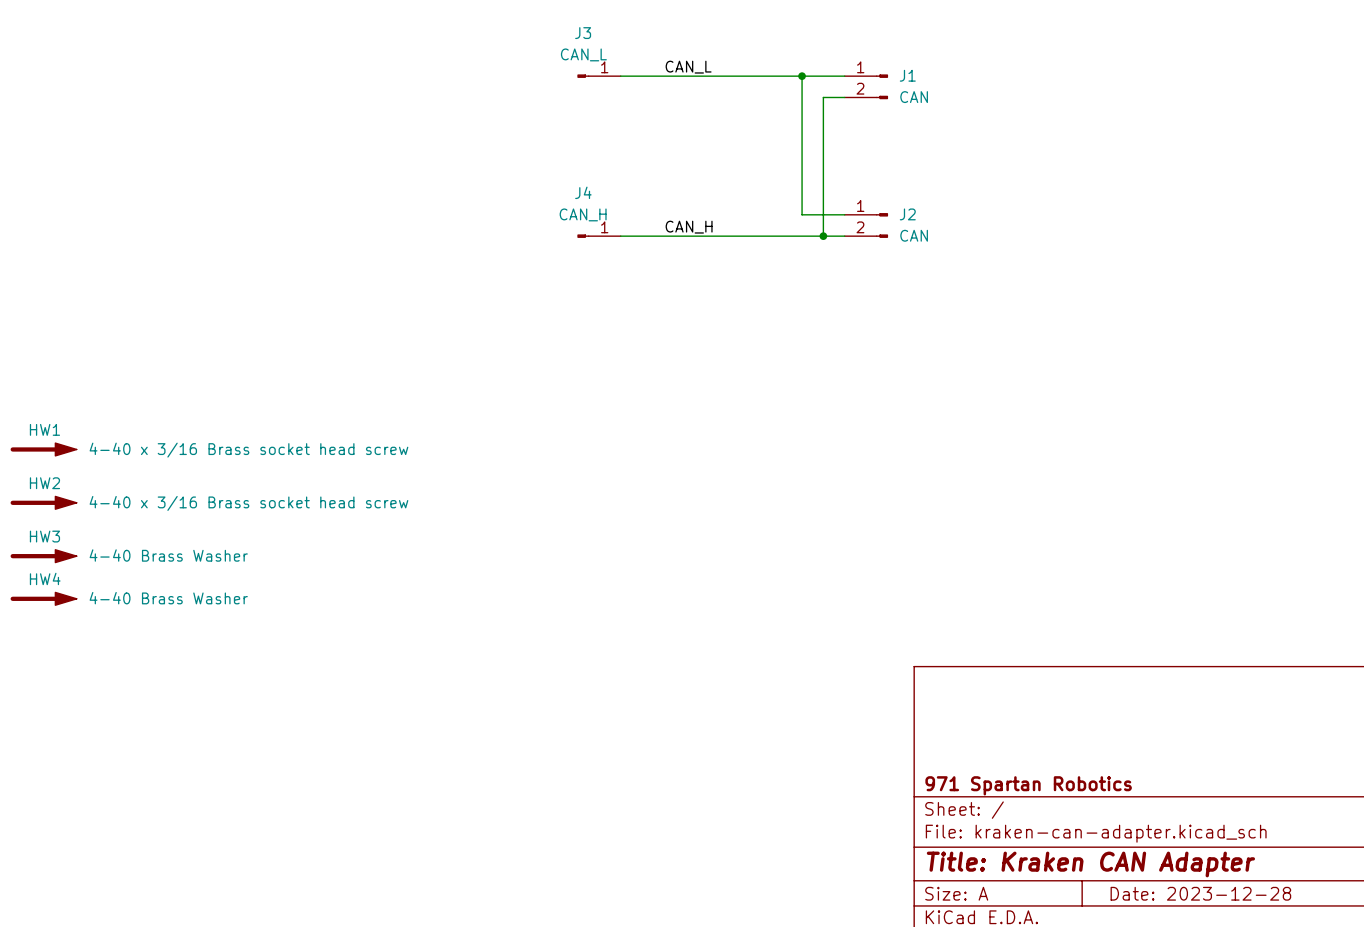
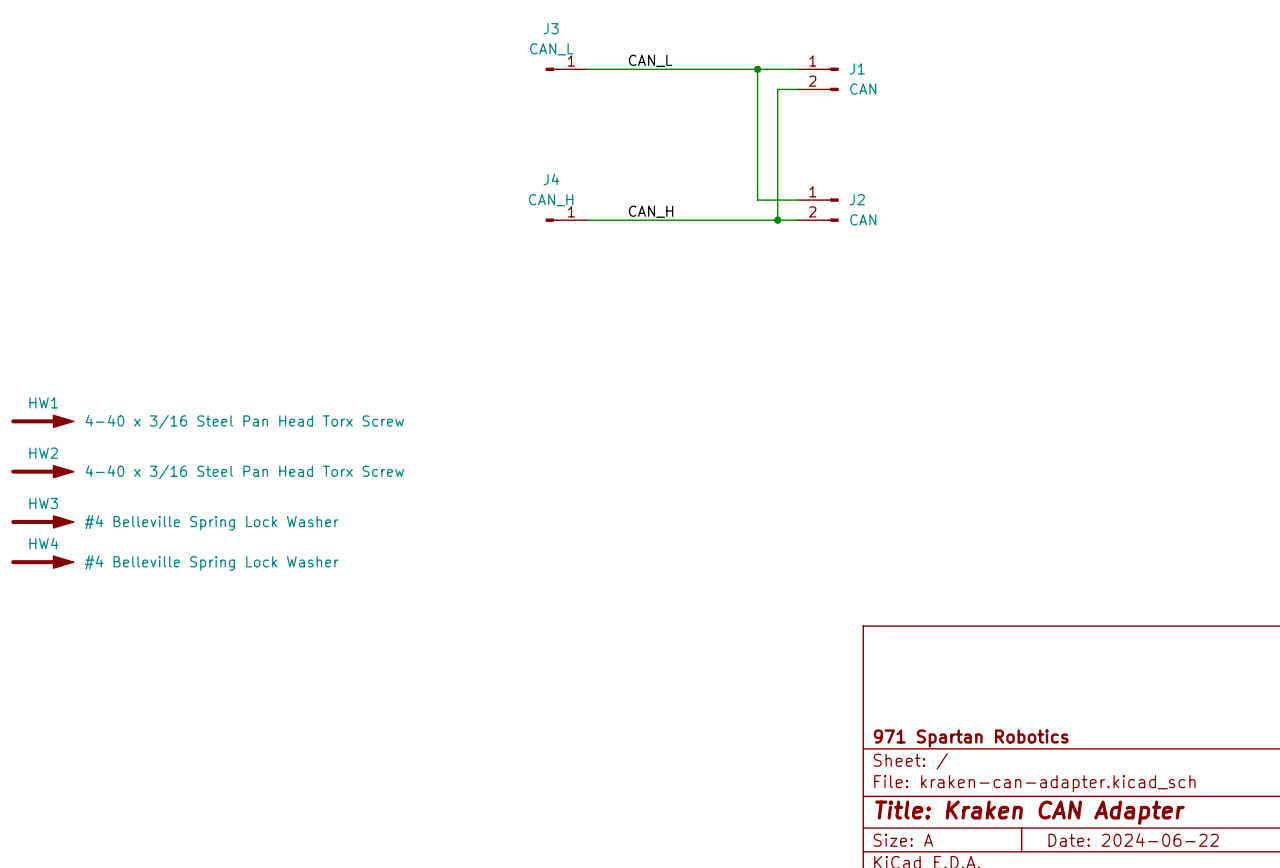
HW1 value: 4-40 x 3/16 Brass socket head screw (248, 450) -> 4-40 x 3/16 Steel Pan Head Torx Screw (244, 421)
HW2 value: 4-40 x 3/16 Brass socket head screw (248, 503) -> 4-40 x 3/16 Steel Pan Head Torx Screw (244, 472)
HW3 value: 4-40 Brass Washer (168, 555) -> #4 Belleville Spring Lock Washer (211, 522)
HW4 value: 4-40 Brass Washer (168, 598) -> #4 Belleville Spring Lock Washer (211, 562)
title block: Date: 2023-12-28 (1200, 893) -> Date: 2024-06-22 (1133, 839)

